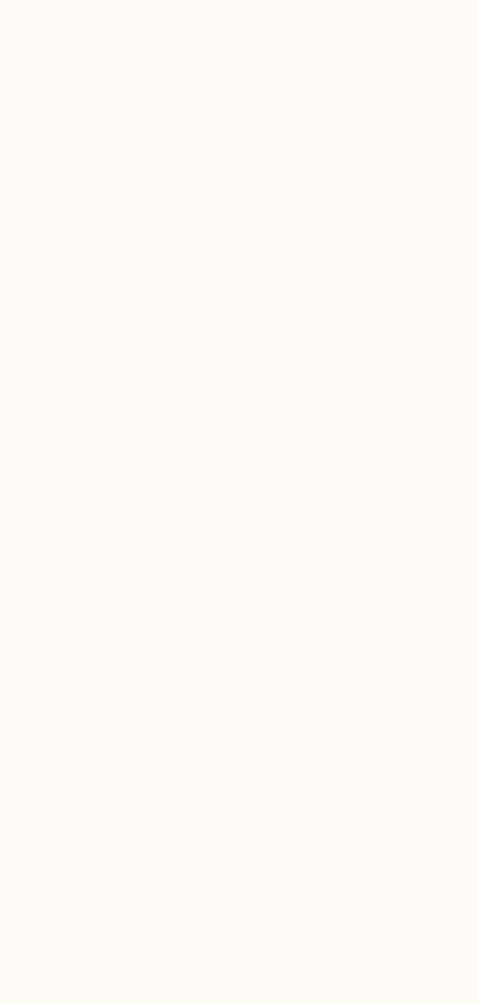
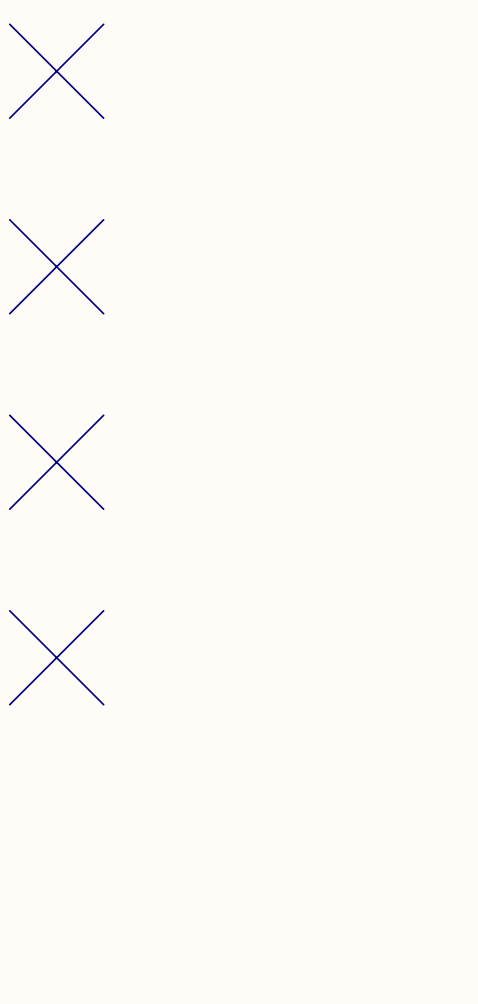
no-connect mark: none -> (56, 71)
no-connect mark: none -> (56, 266)
no-connect mark: none -> (56, 462)
no-connect mark: none -> (56, 657)

